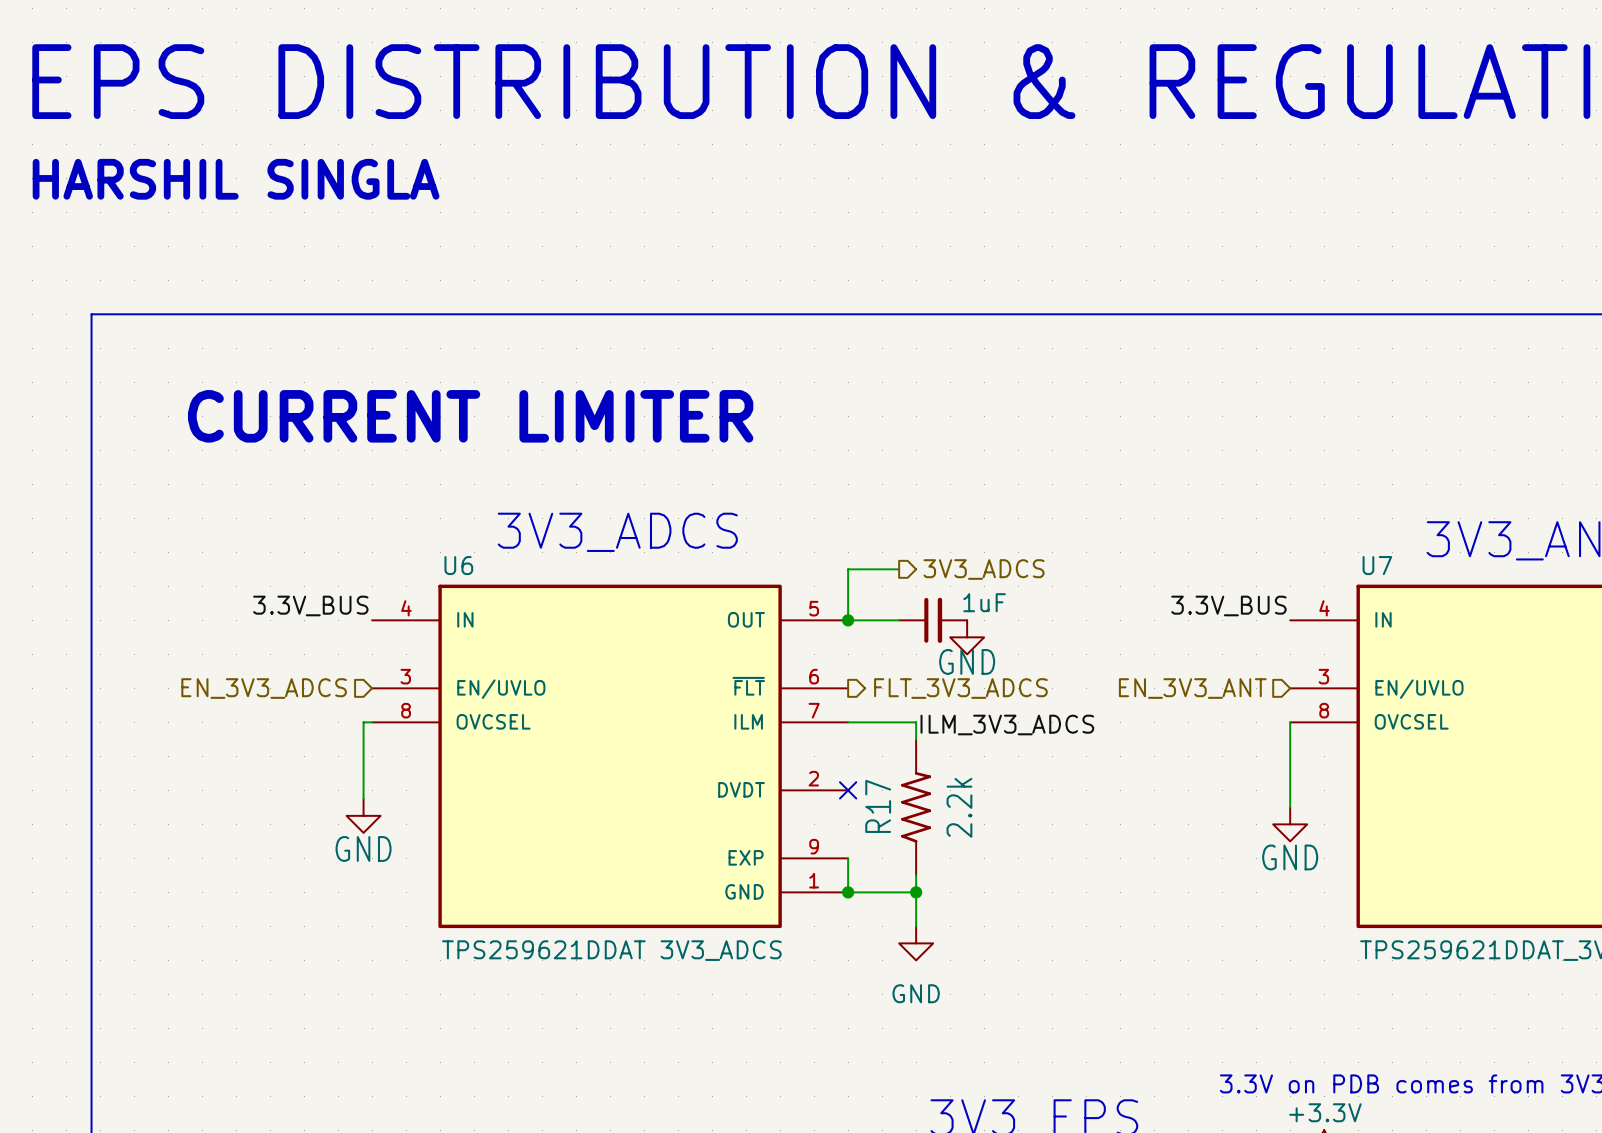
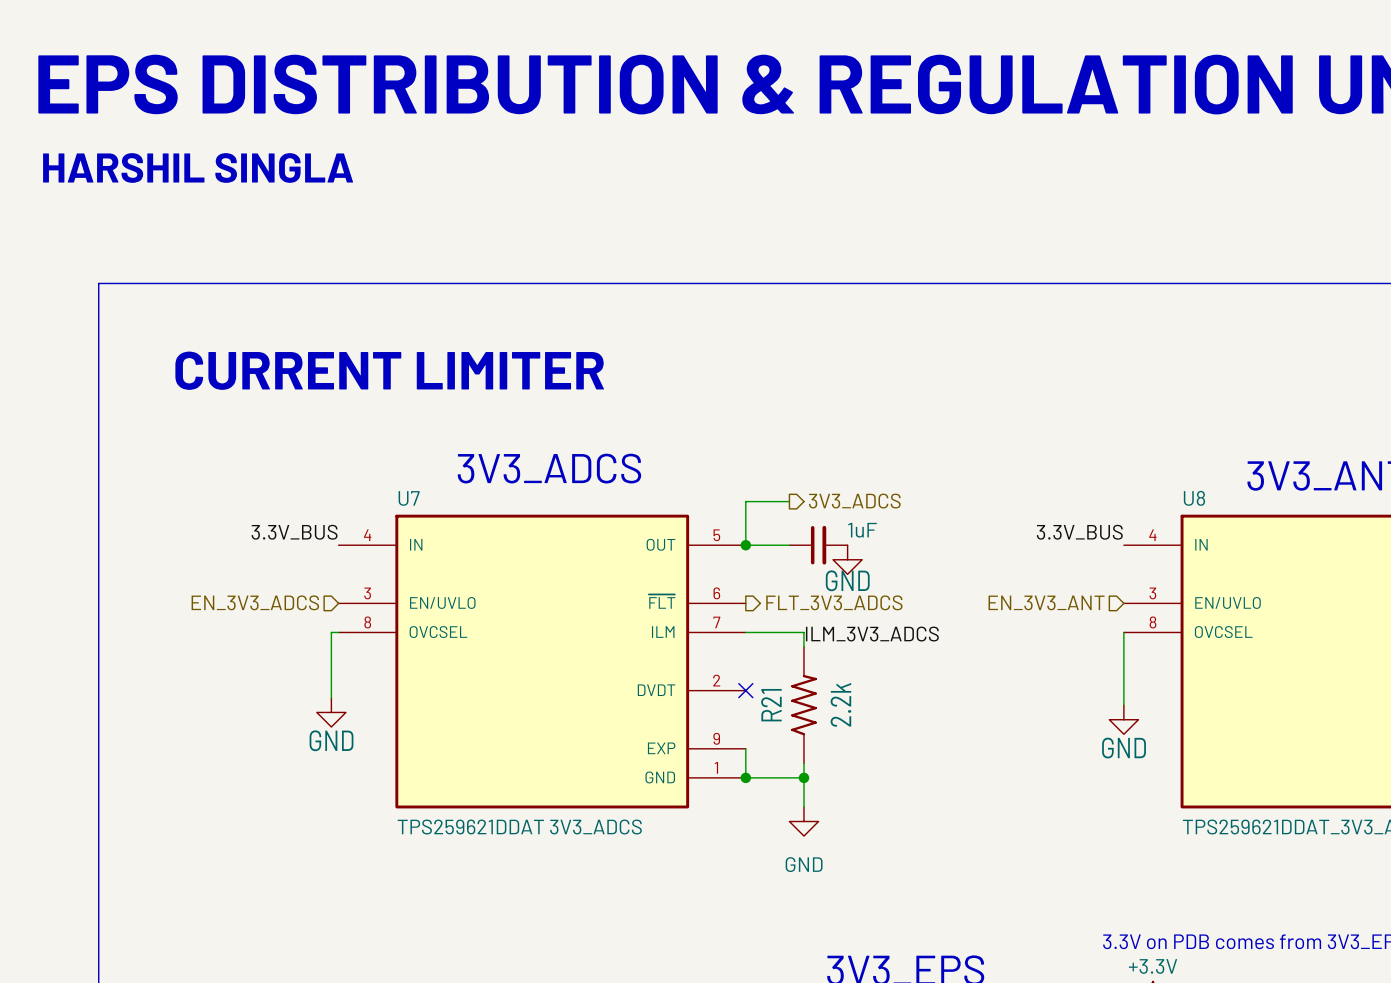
U6 name: U6 (458, 565) -> U7 (409, 498)
U7 name: U7 (1377, 565) -> U8 (1194, 498)
R17 name: R17 (878, 806) -> R21 (771, 705)

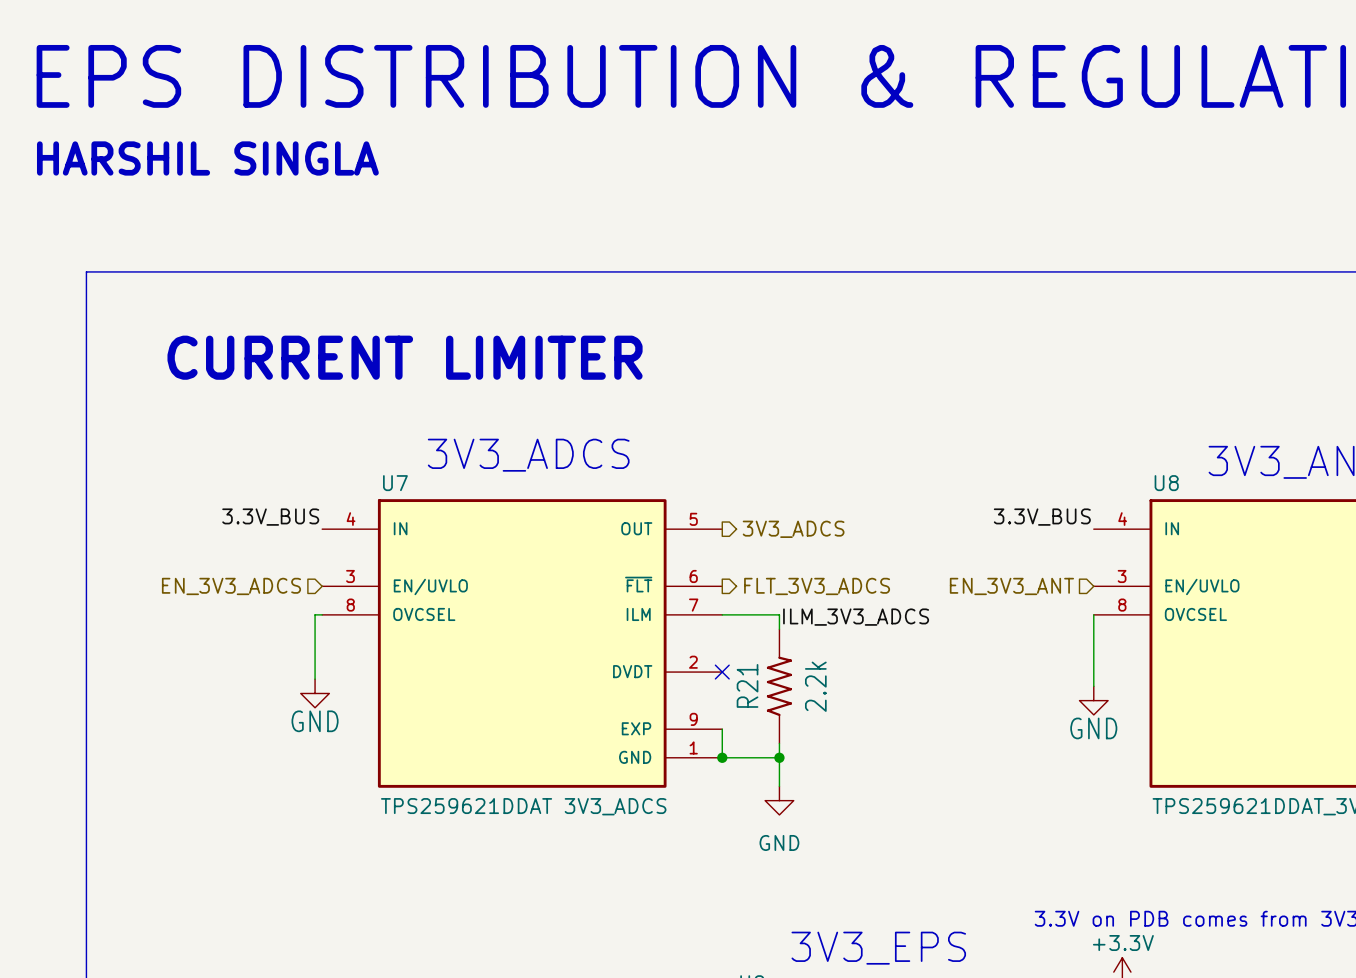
wire: (789, 501) (745, 501) (745, 545) (789, 545) -> none
hierarchical label position: 3V3_ADCS (854, 501) -> 3V3_ADCS (793, 529)
junction: (745, 545) -> none
part: 1uF (818, 545) -> none
power symbol: GND (847, 559) -> none

